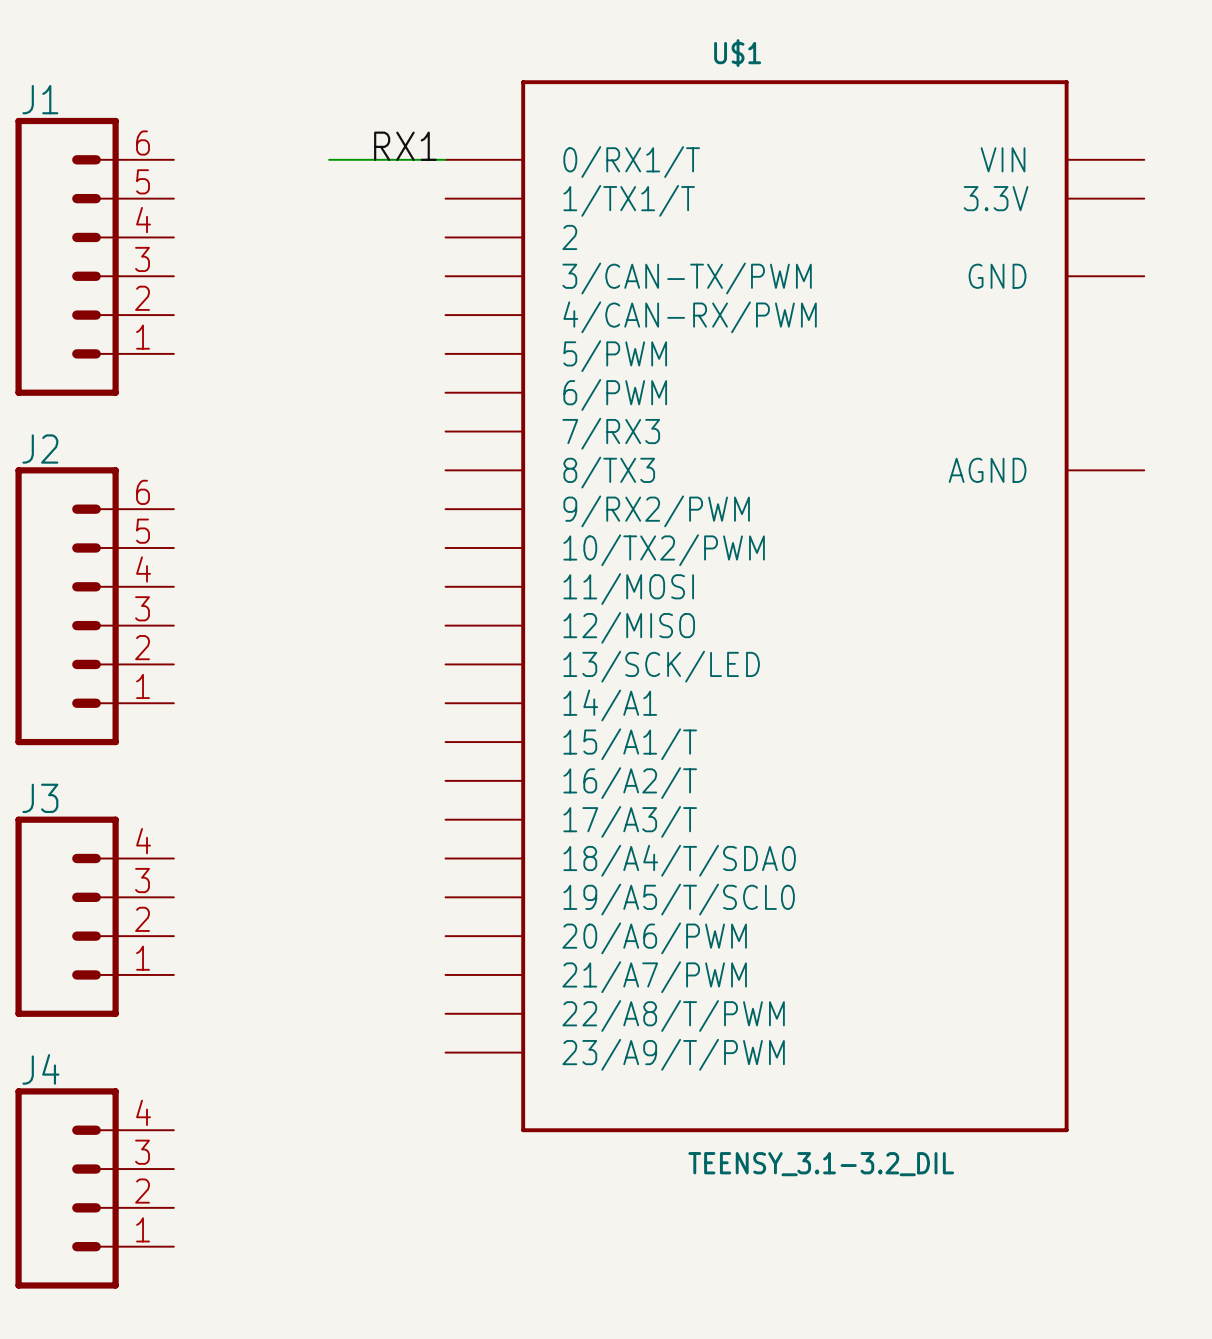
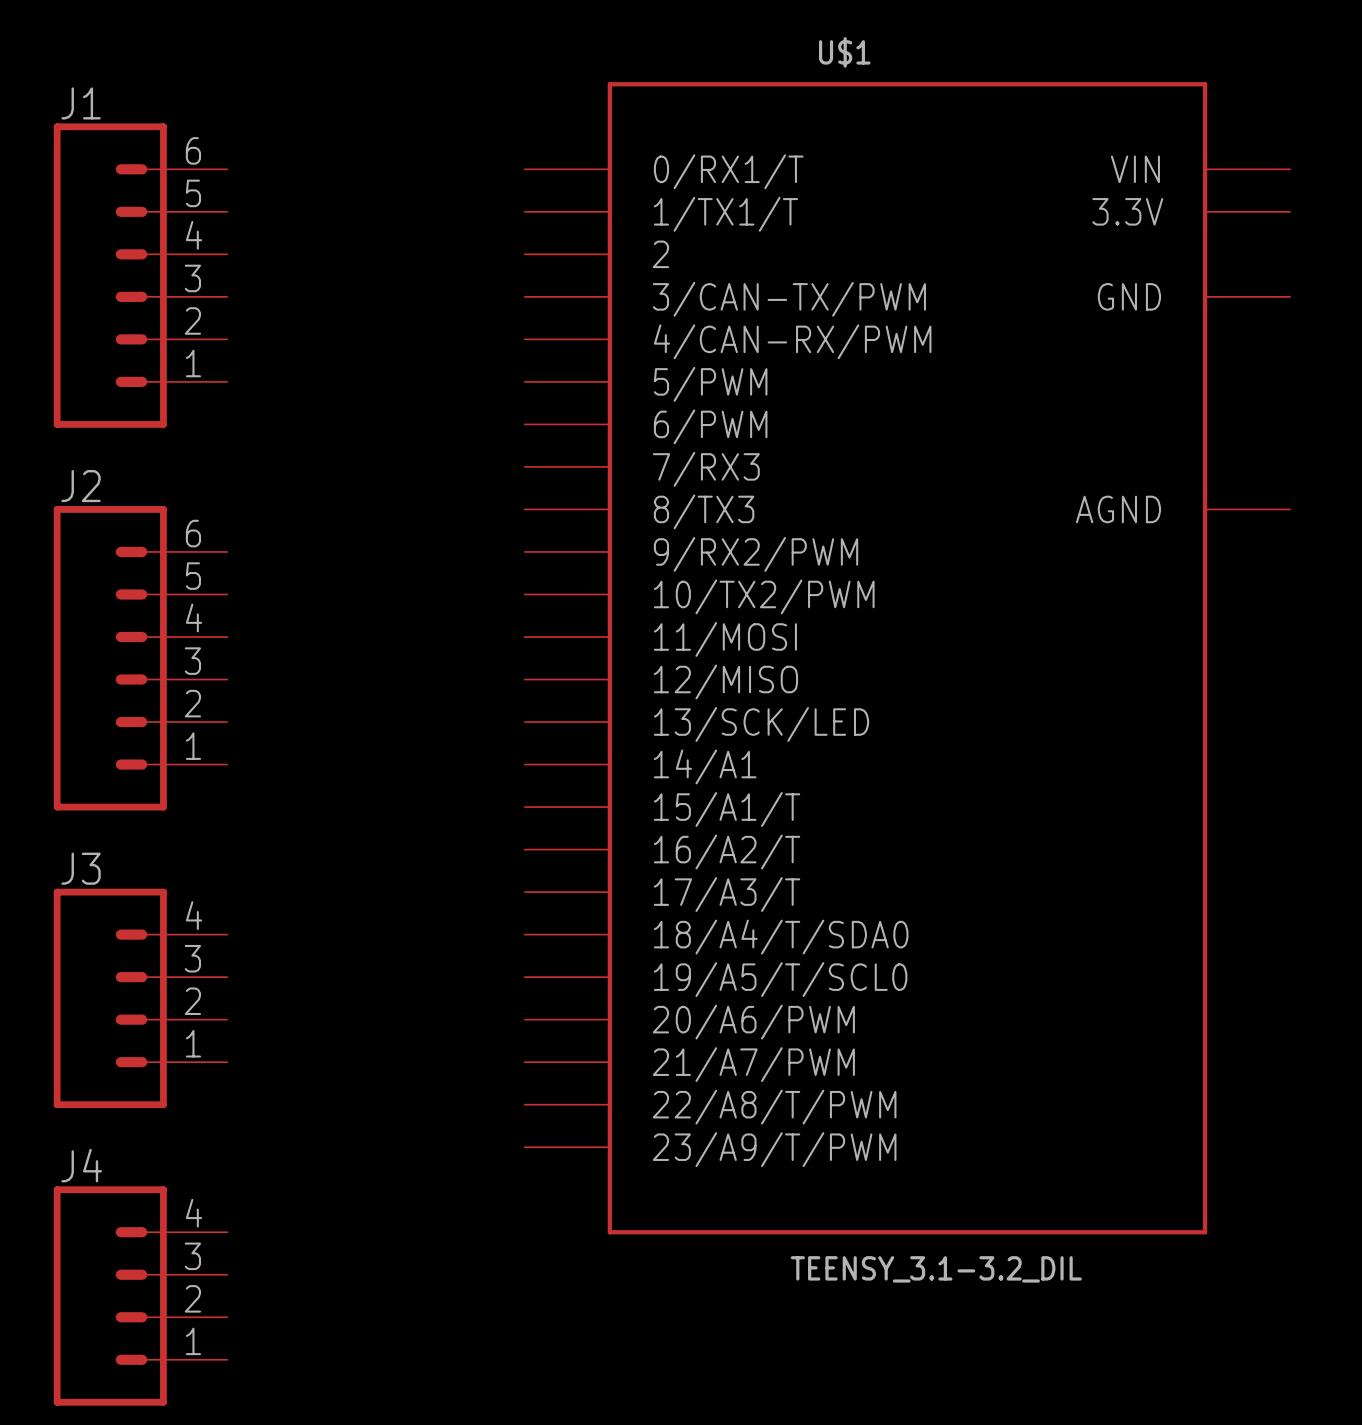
label: RX1 (405, 146) -> none
wire: (329, 159) (445, 159) -> none

